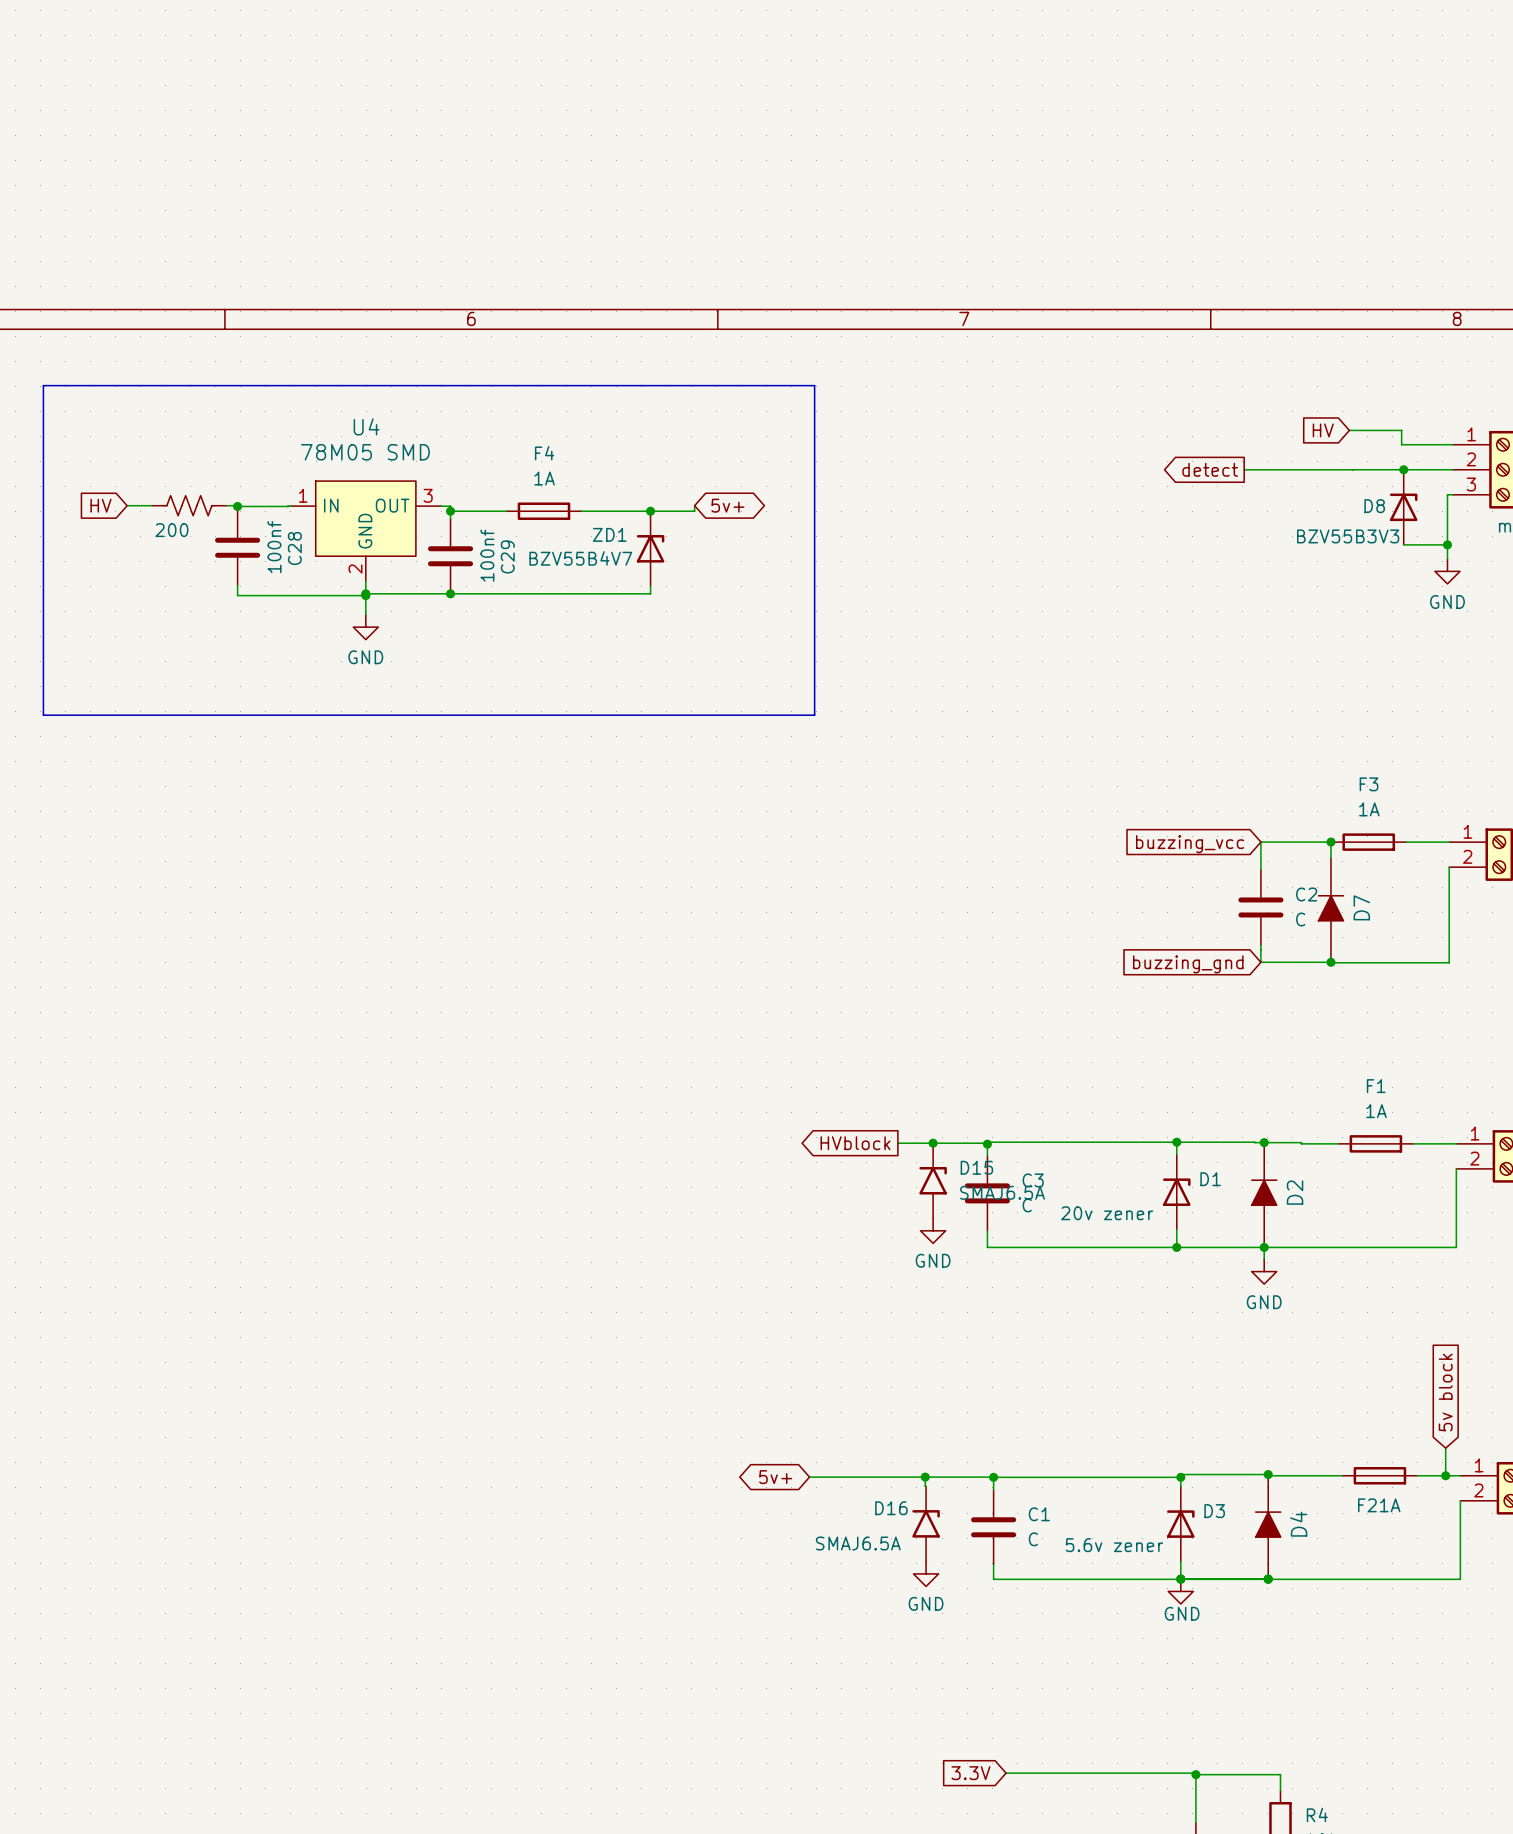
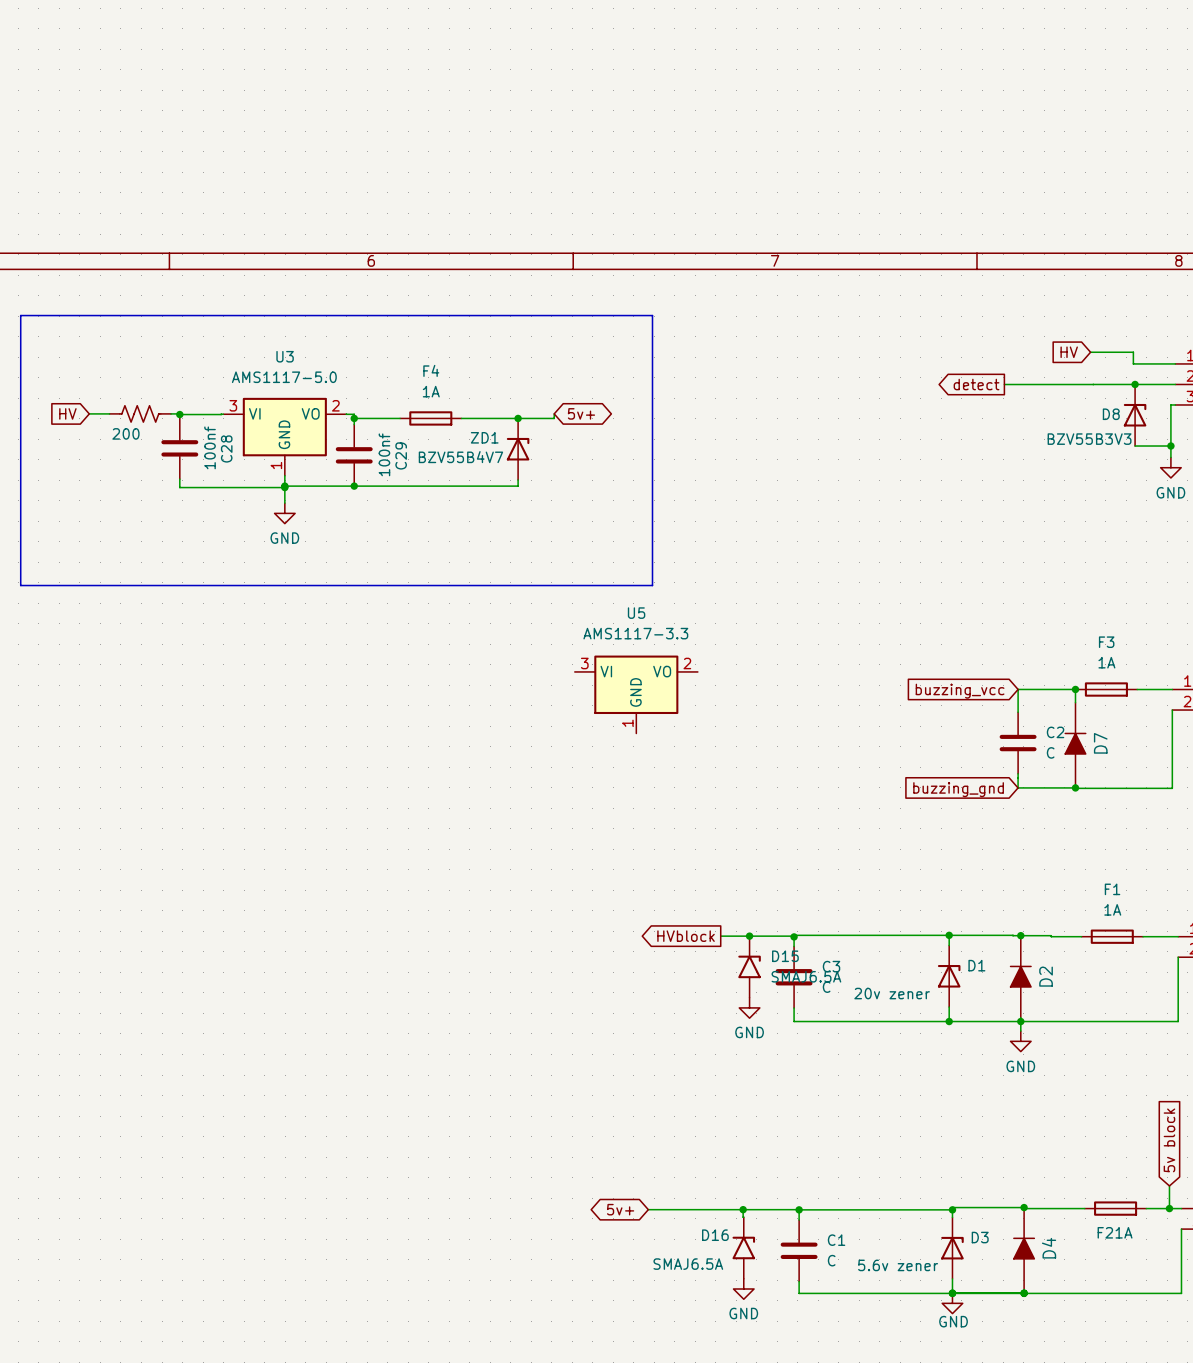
U4: 78M05 SMD (365, 531) -> none
U3: none -> AMS1117-5.0 (284, 436)
U5: none -> AMS1117-3.3 (636, 694)

